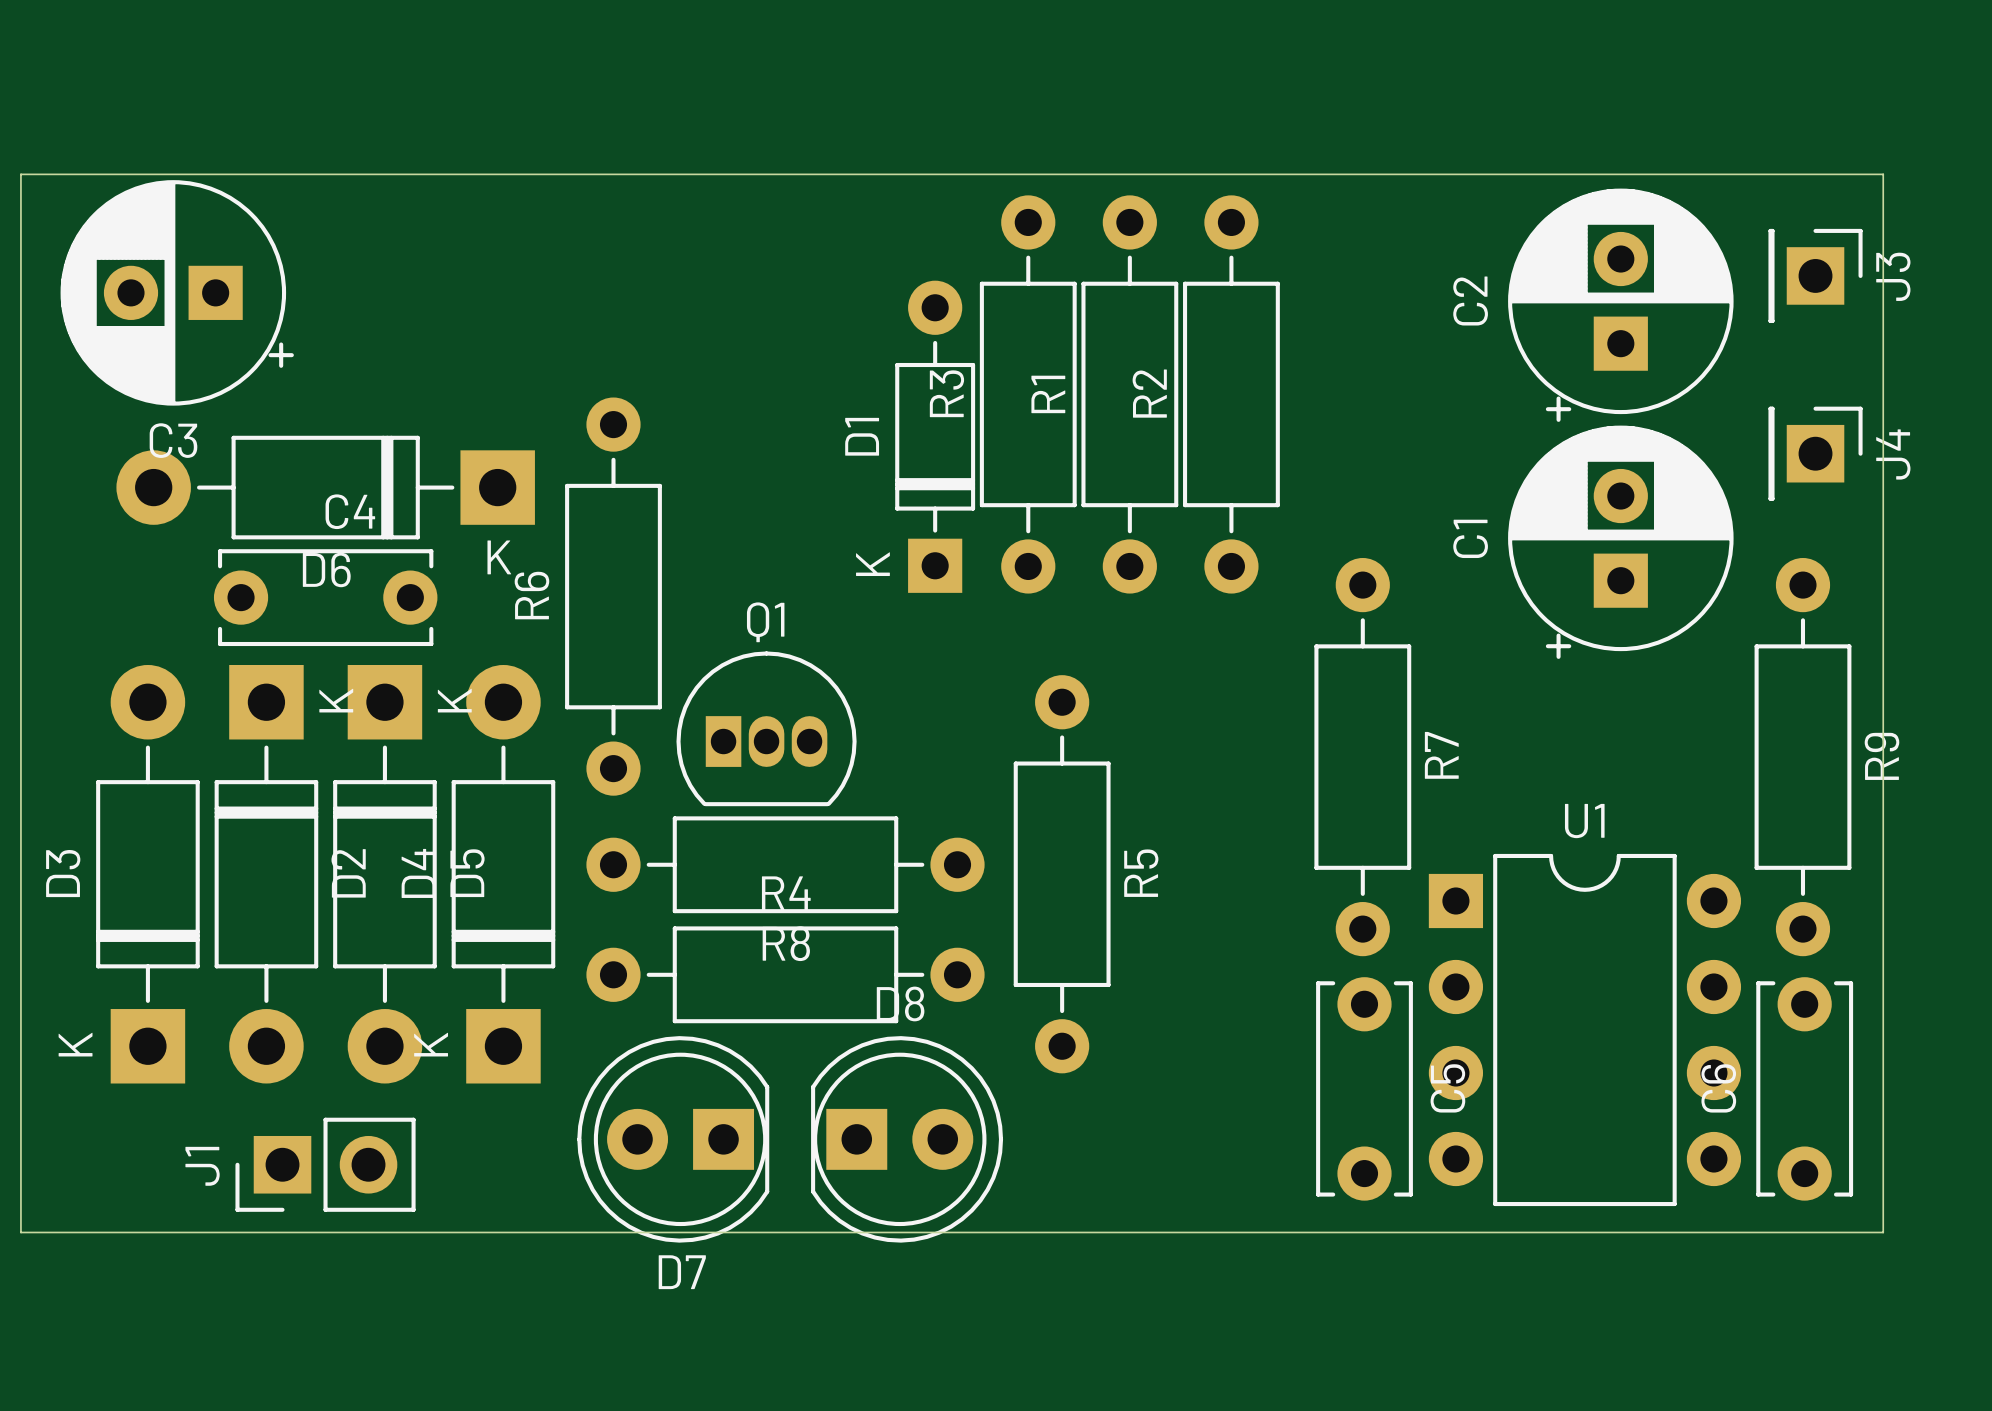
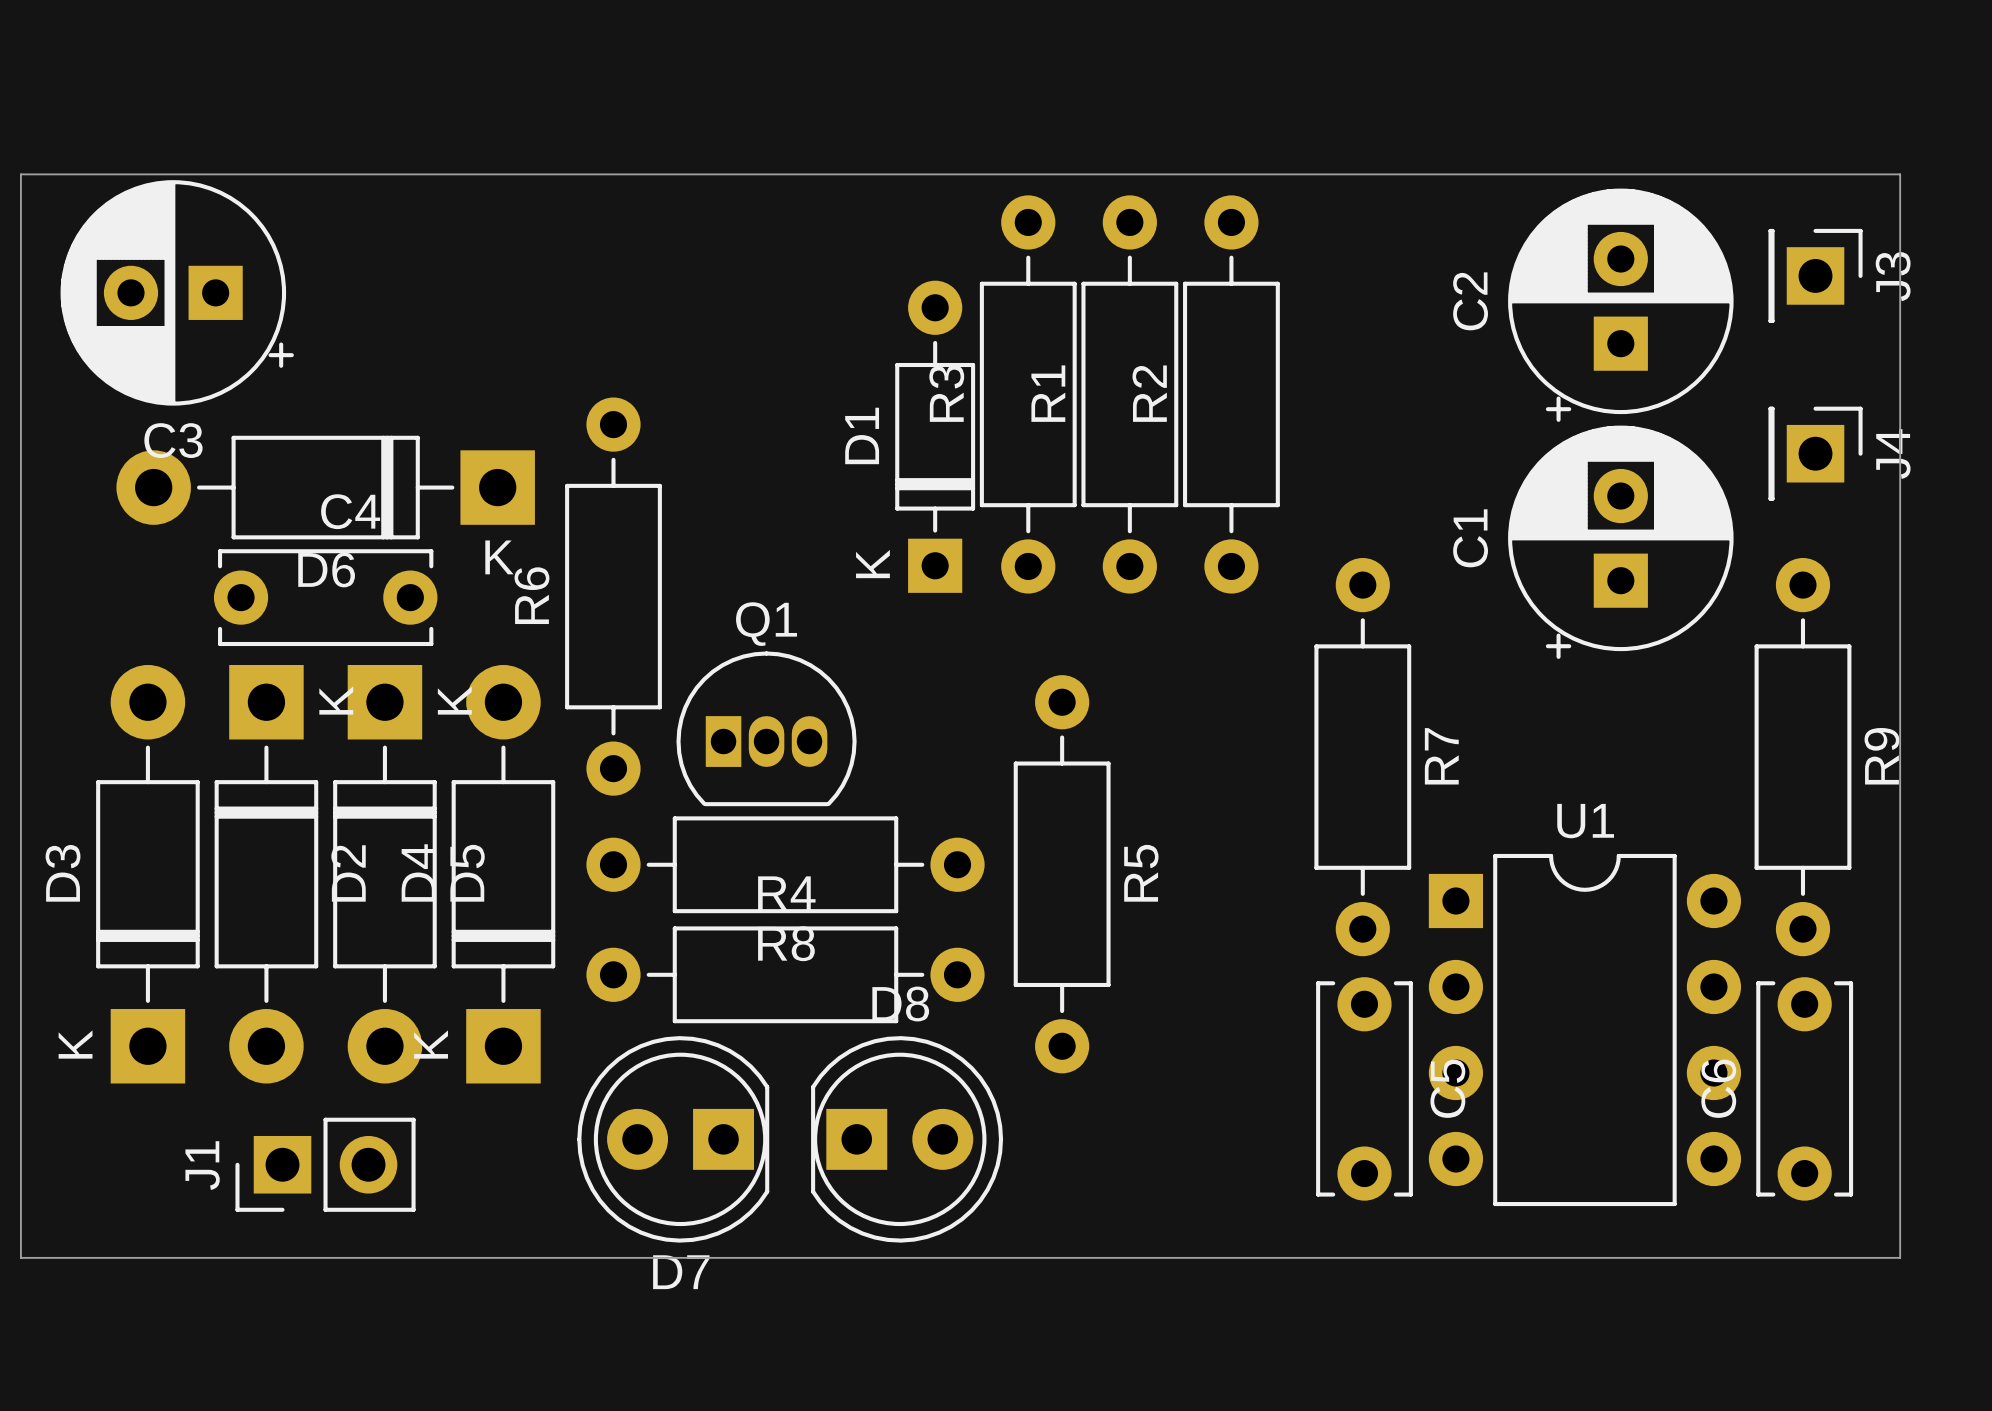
board edge: (1883, 174) (1883, 1232) (20, 1232) -> (1883, 174) (1900, 174) (1900, 1257) (20, 1257) (20, 1232)

